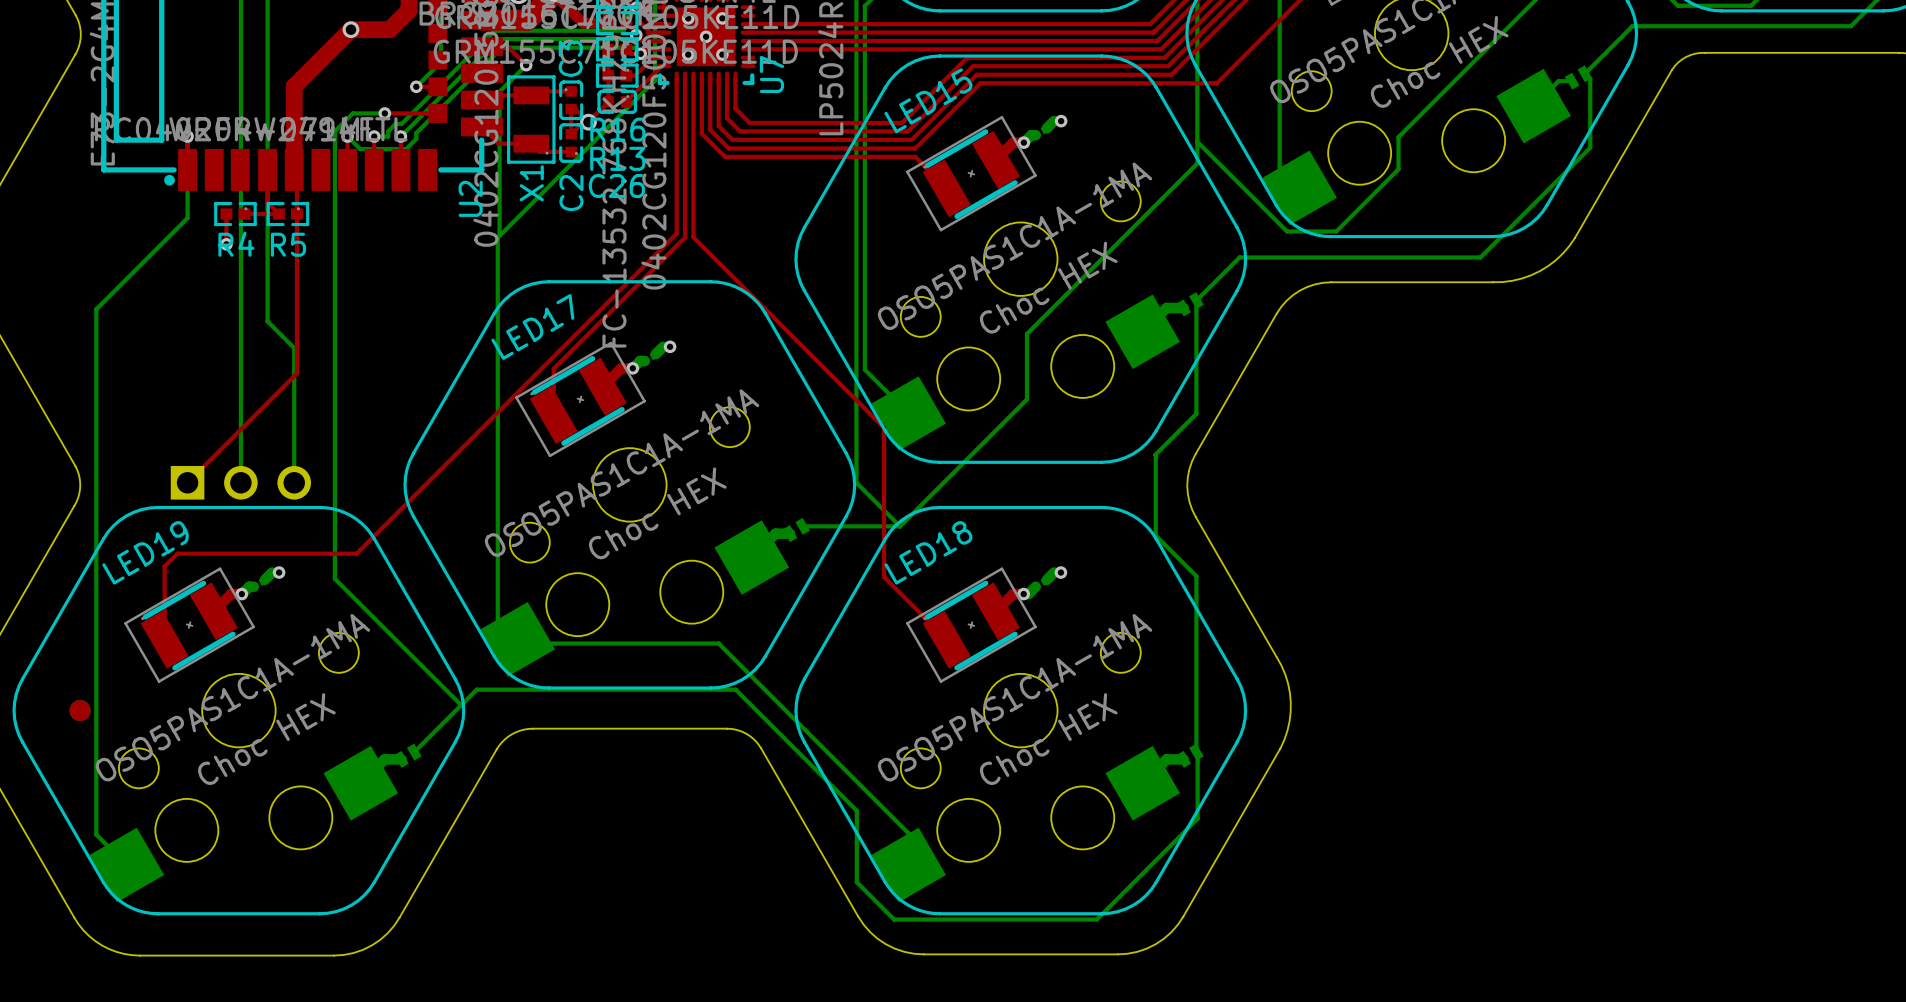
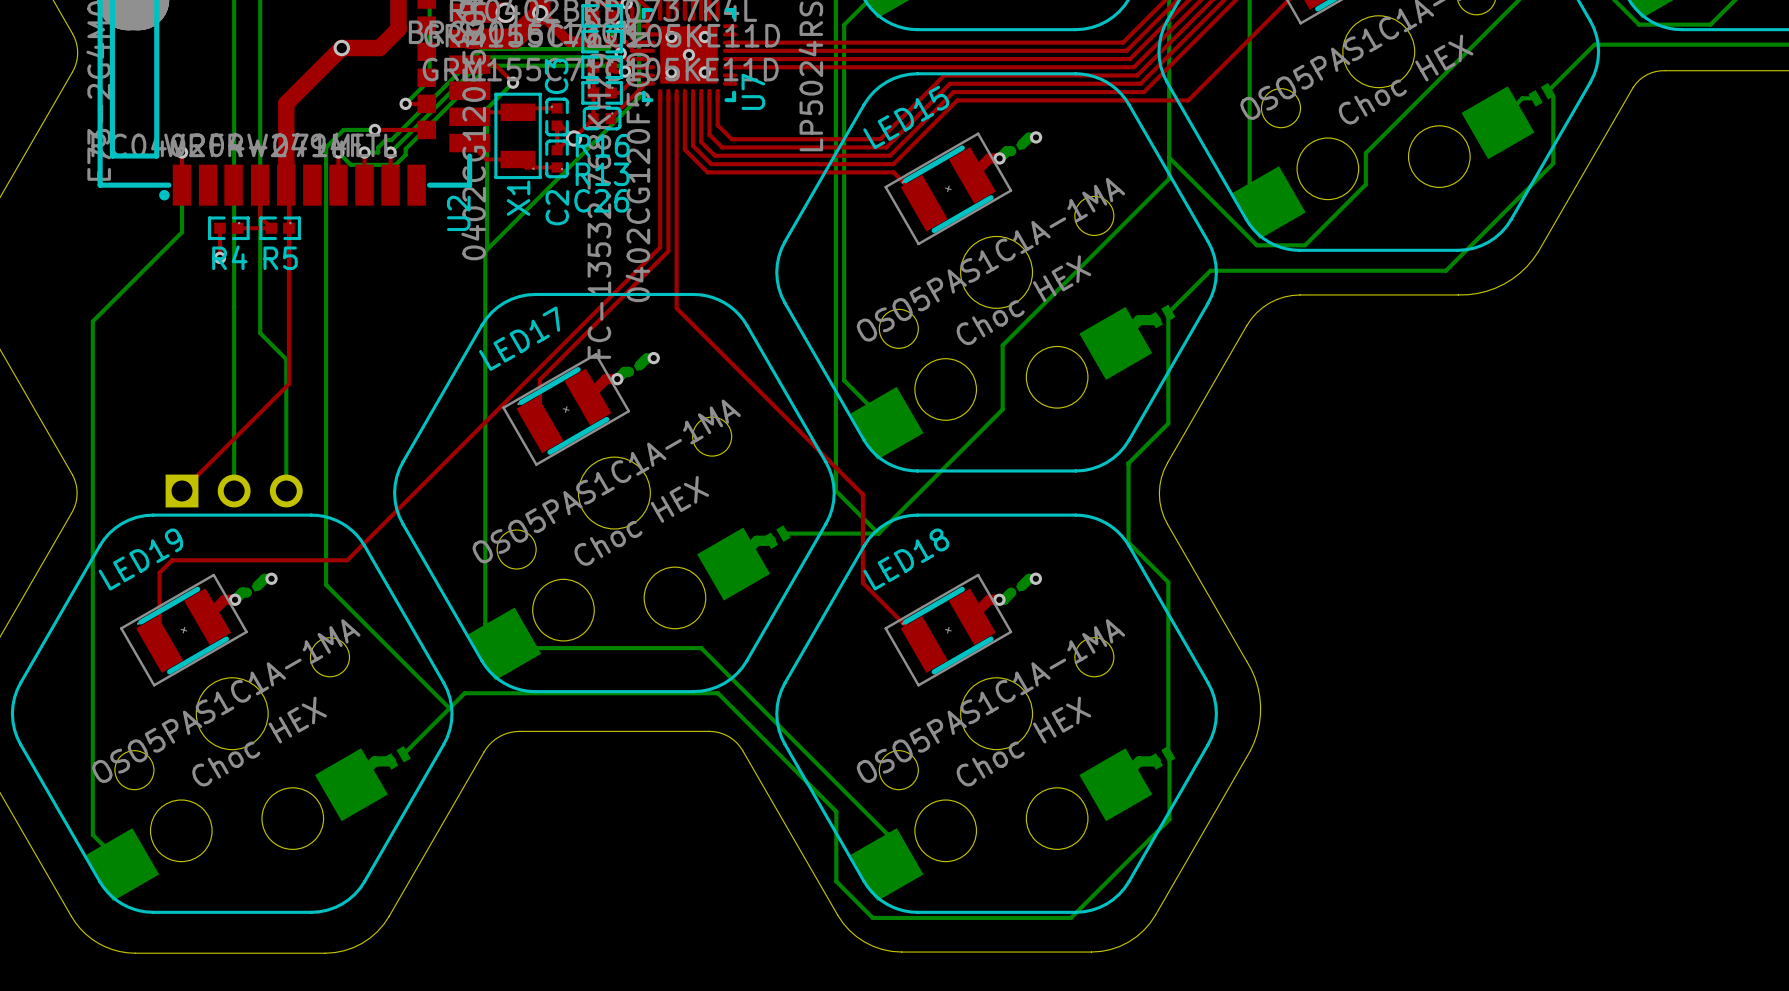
top track: (693, 237) (884, 427) (884, 486) -> (676, 250) (676, 308) (862, 494)
part: (80, 710) -> none

